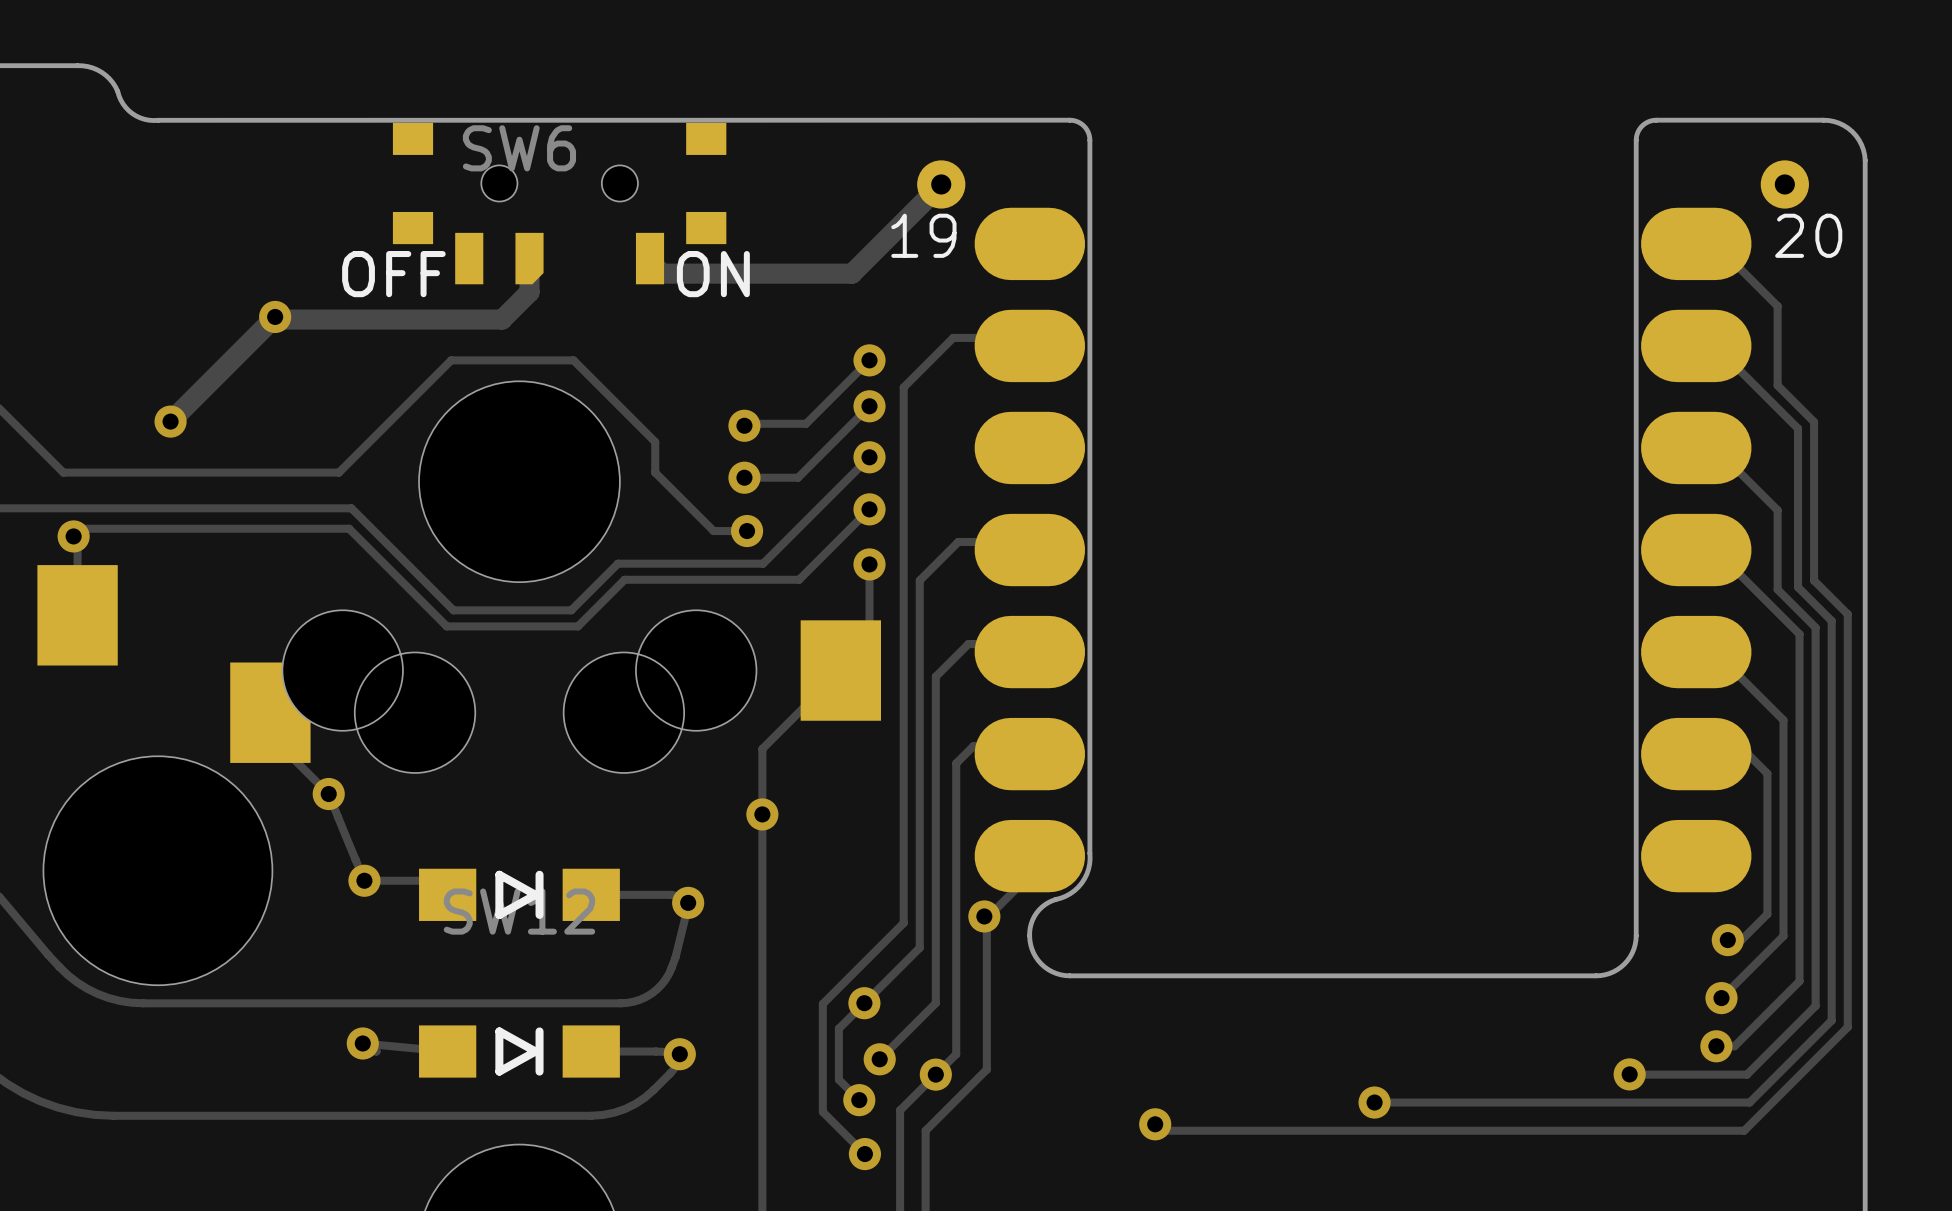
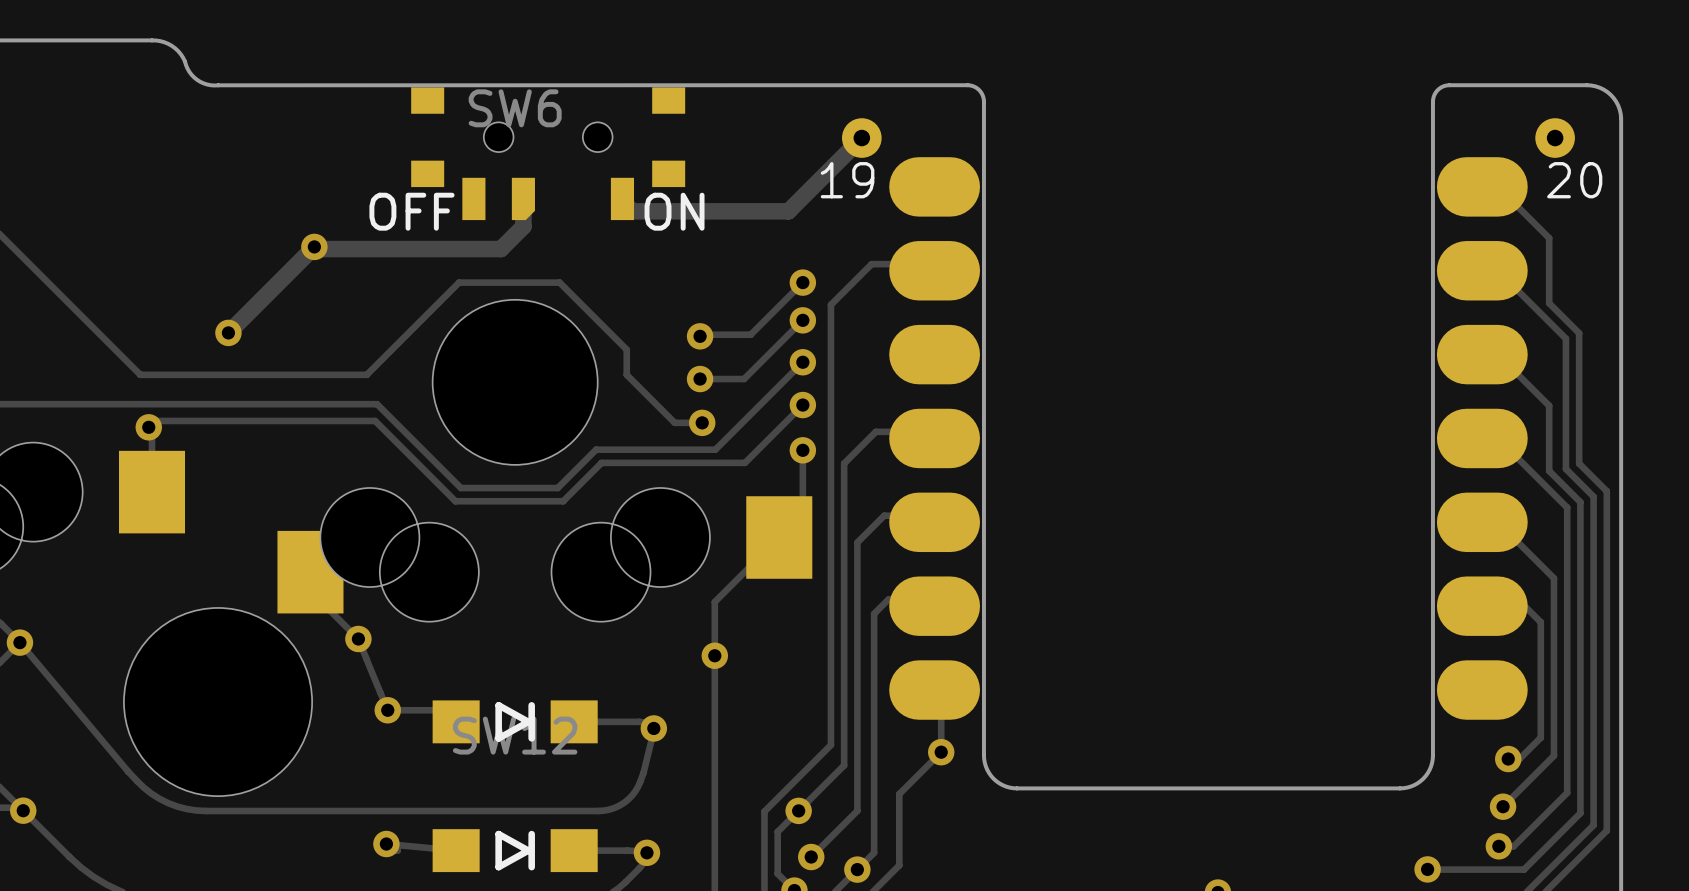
part footprint: [917, 117, 1809, 979] -> [842, 83, 1575, 791]
track: (1037, 867) (988, 916) (984, 916) (986, 918) (986, 982) -> (941, 699) (941, 752) (899, 794)
via position: (984, 916) -> (941, 752)

